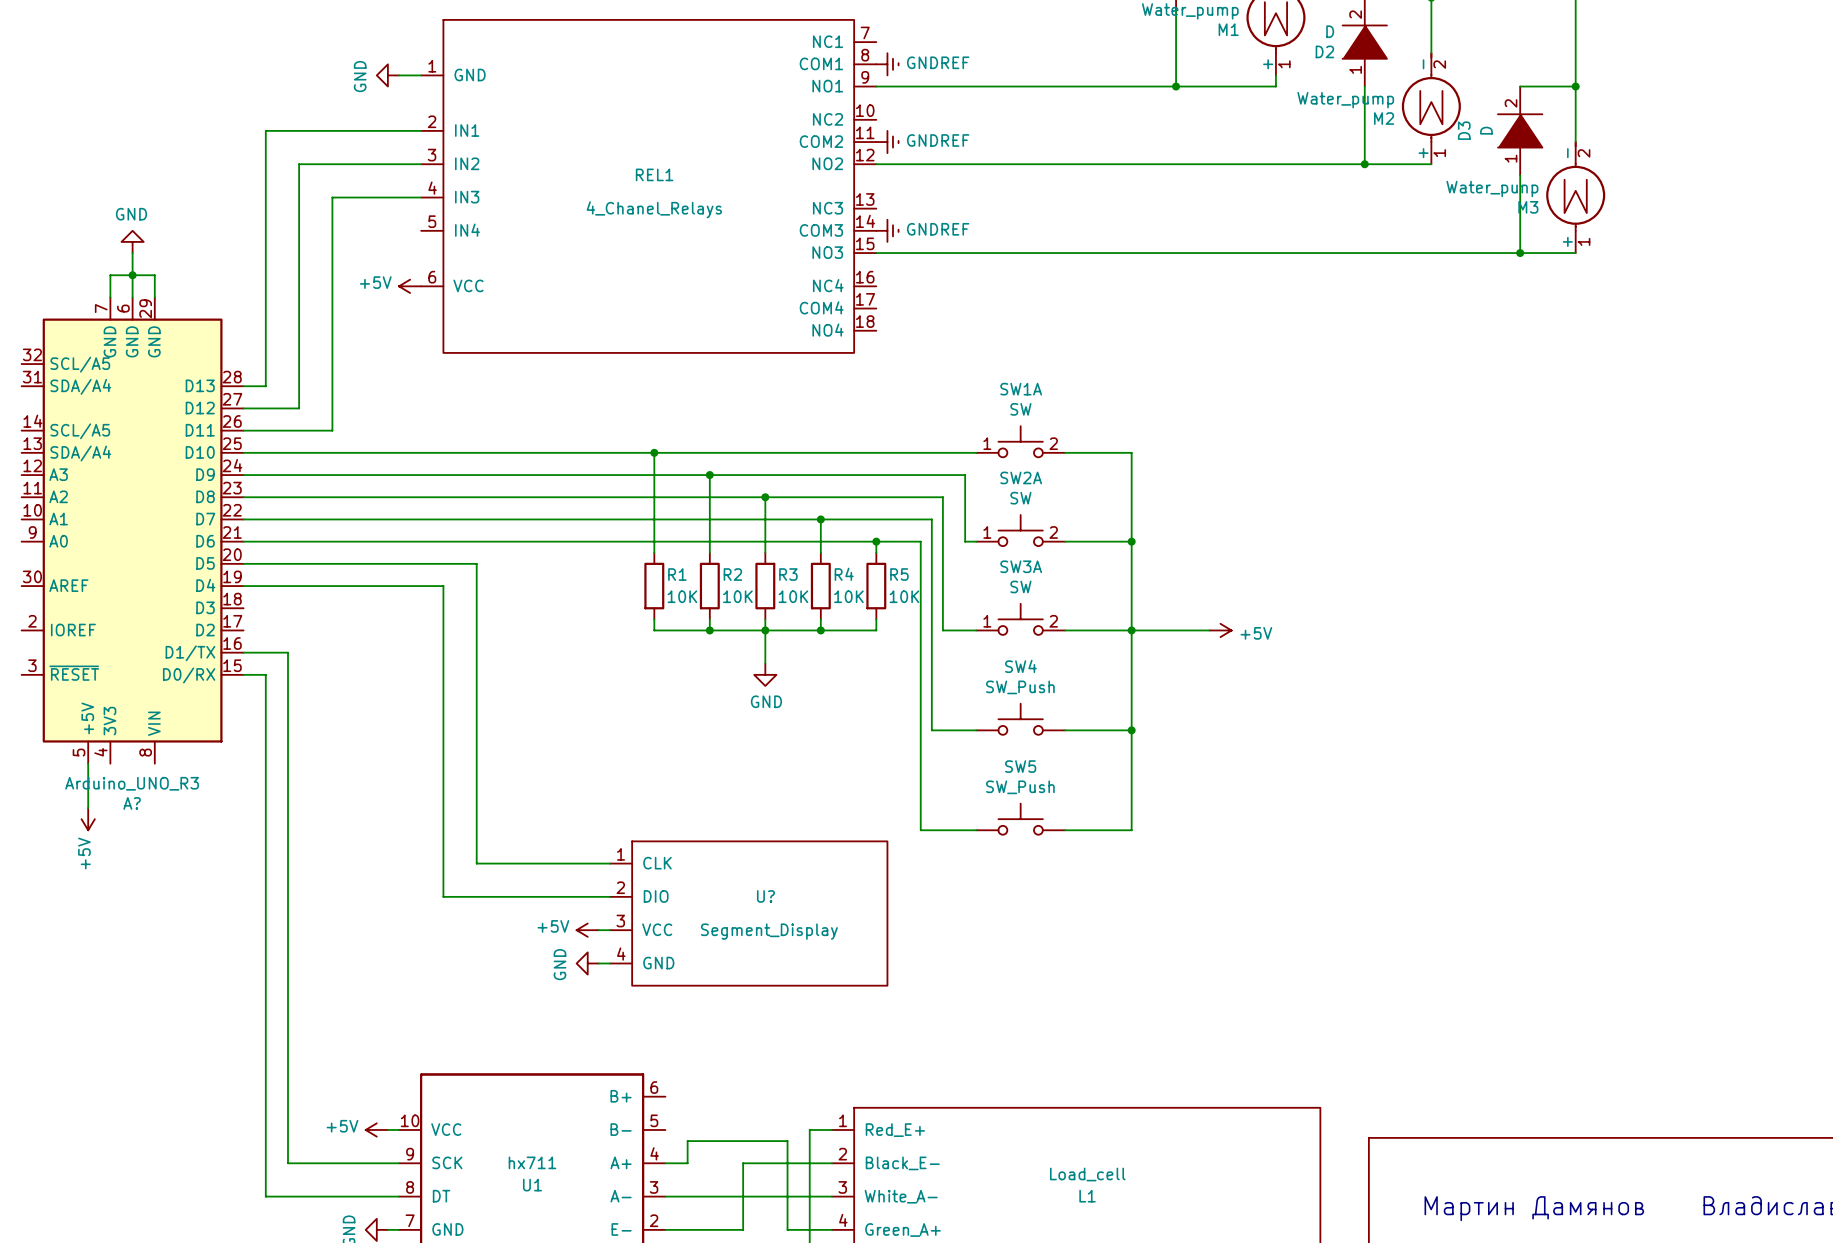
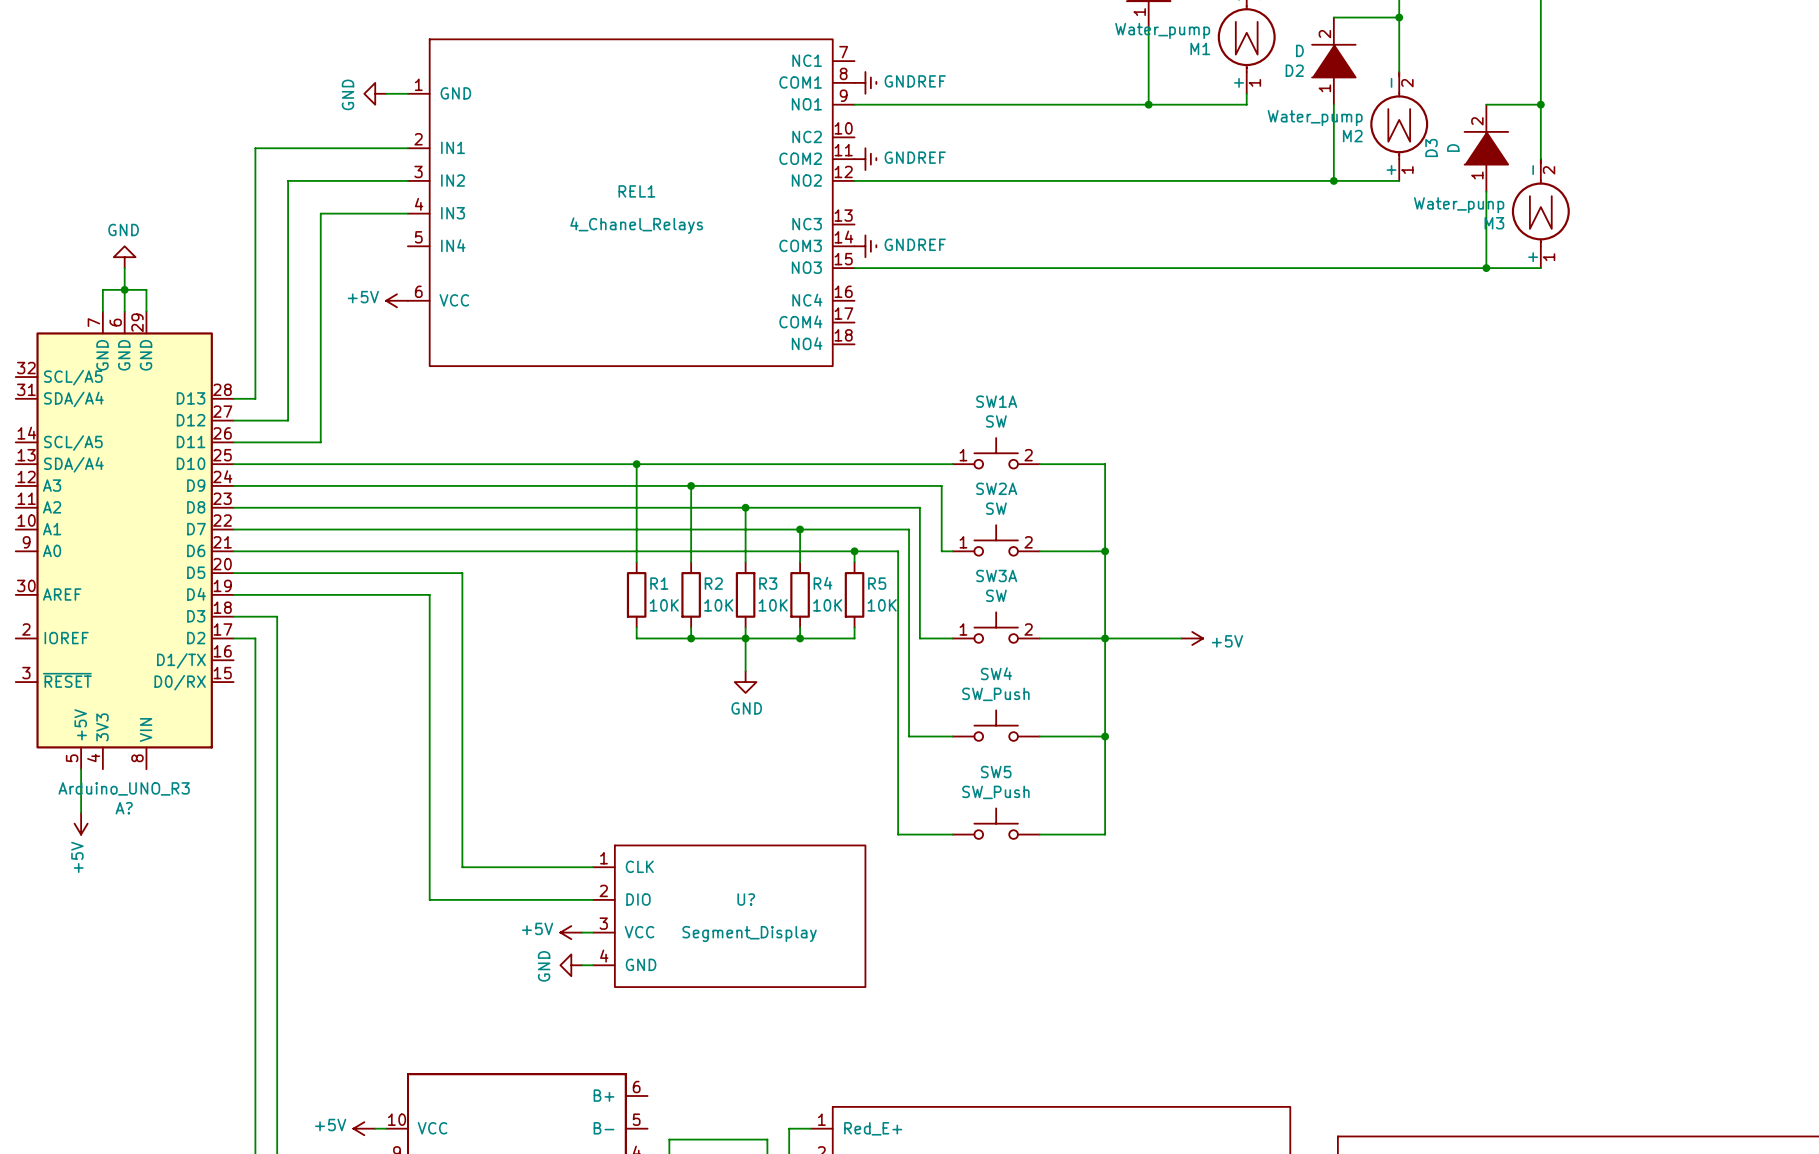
wire: (243, 652) (288, 652) -> (233, 616) (277, 616) (277, 660)
wire: (243, 674) (265, 674) -> (233, 638) (255, 638) (255, 682)

